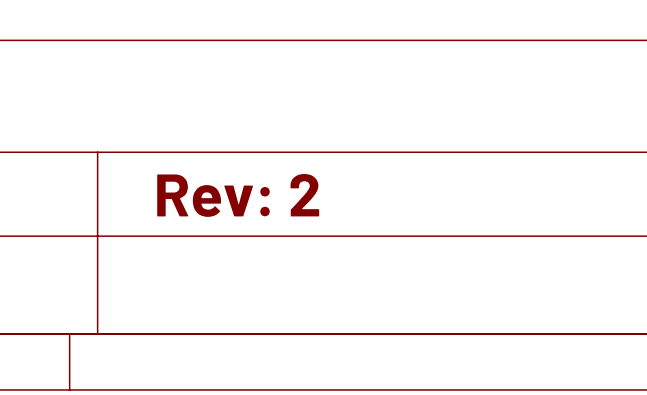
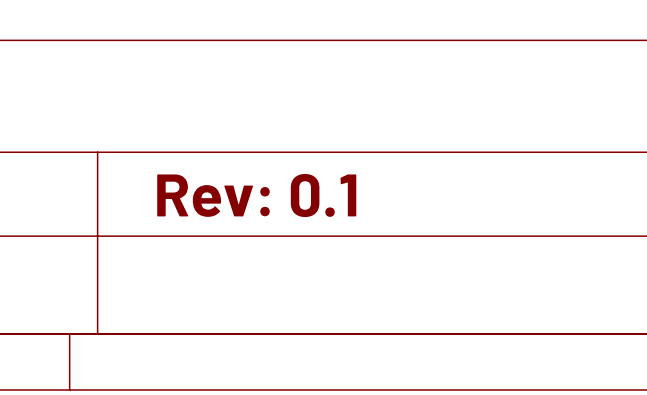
title block: Rev: 2 (238, 195) -> Rev: 0.1 (256, 195)

